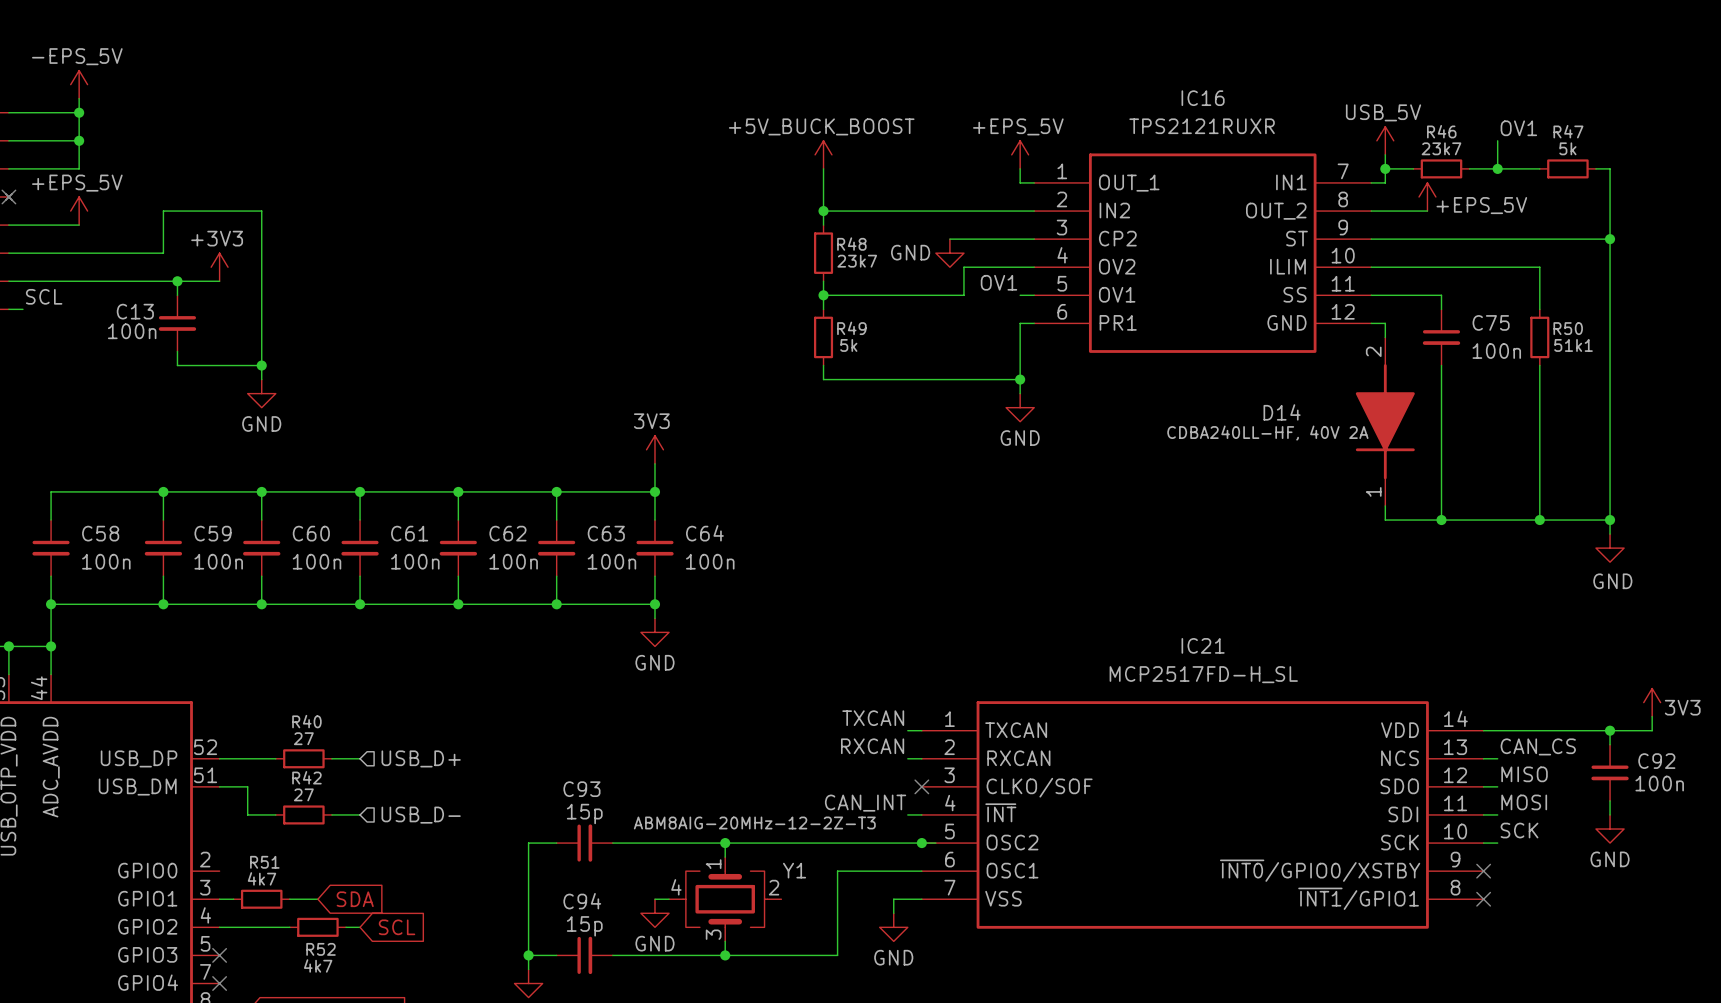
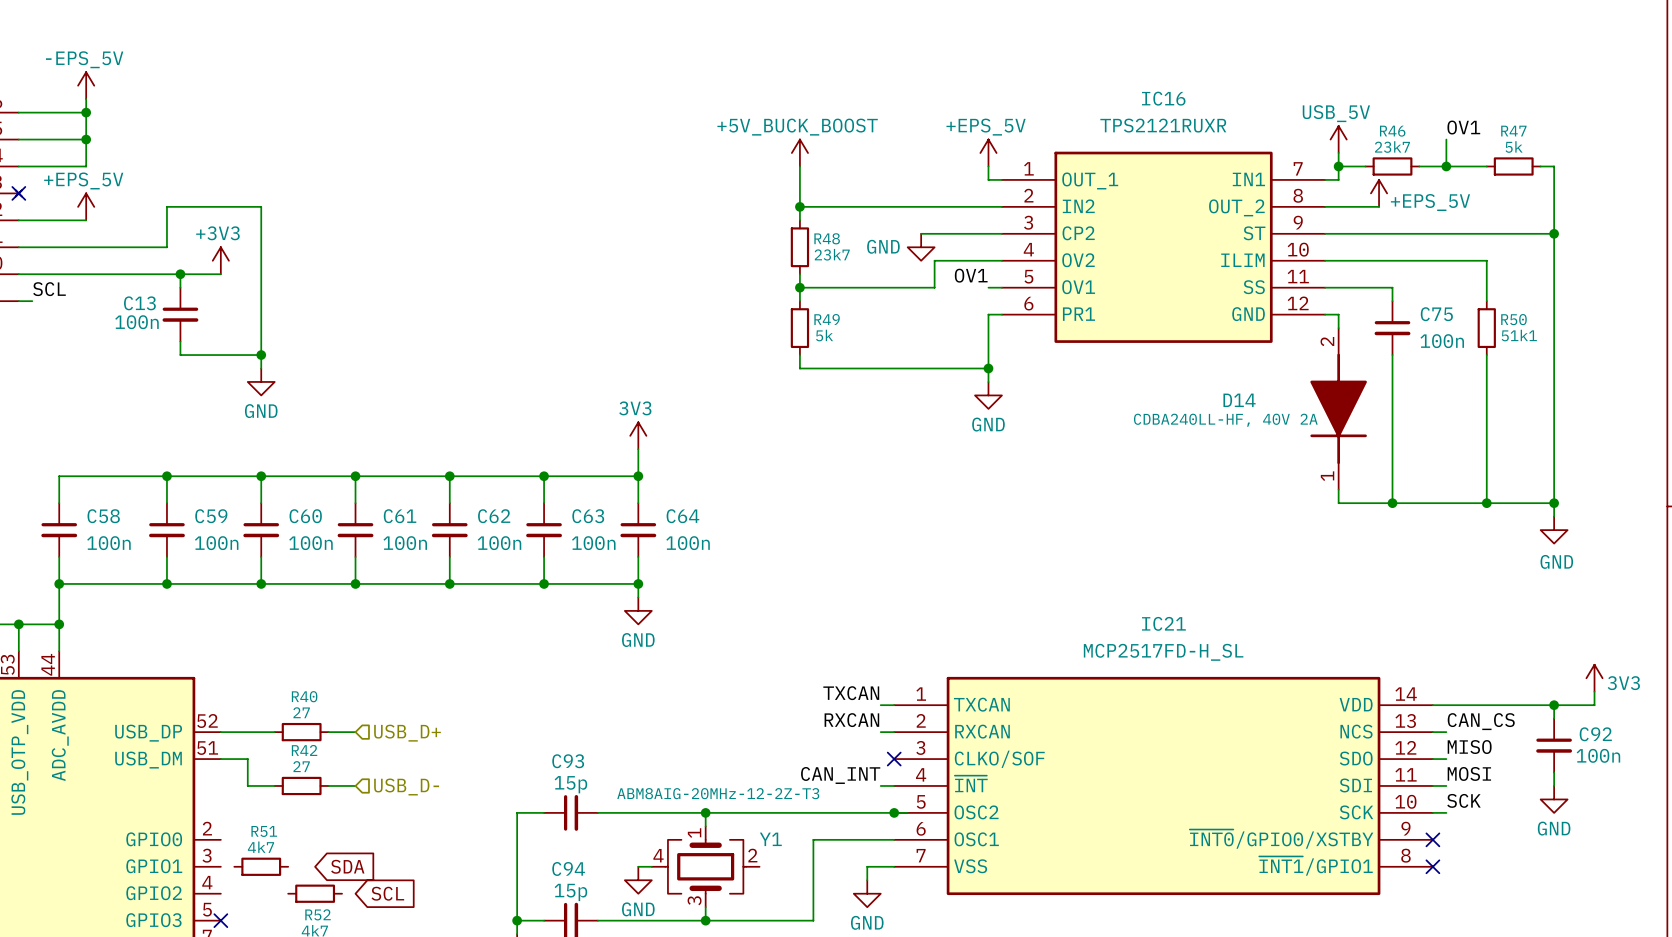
wire: (219, 899) (233, 899) -> none
wire: (289, 899) (317, 899) -> none
wire: (219, 927) (289, 927) -> none
wire: (346, 927) (360, 927) -> none

